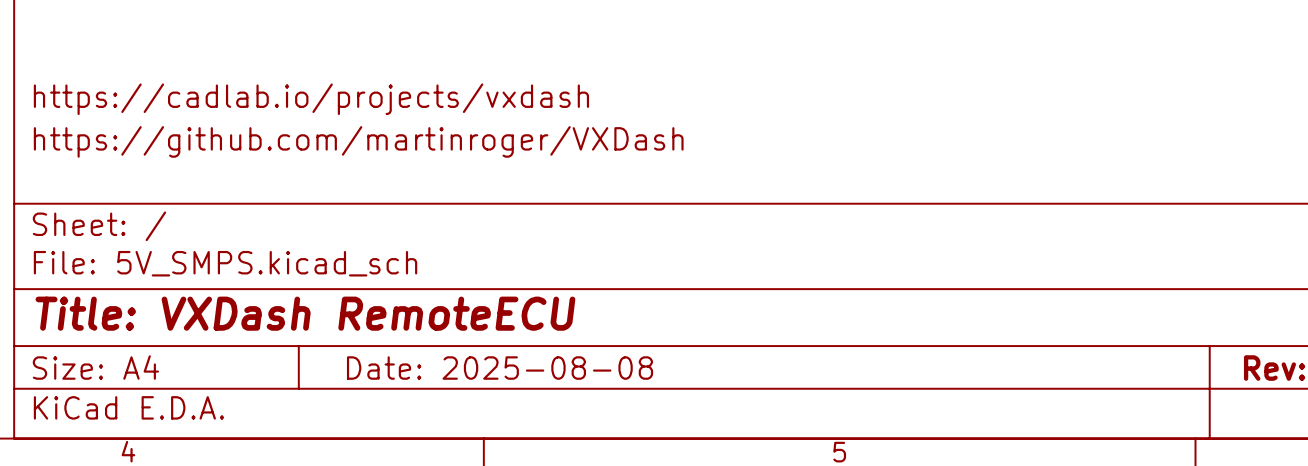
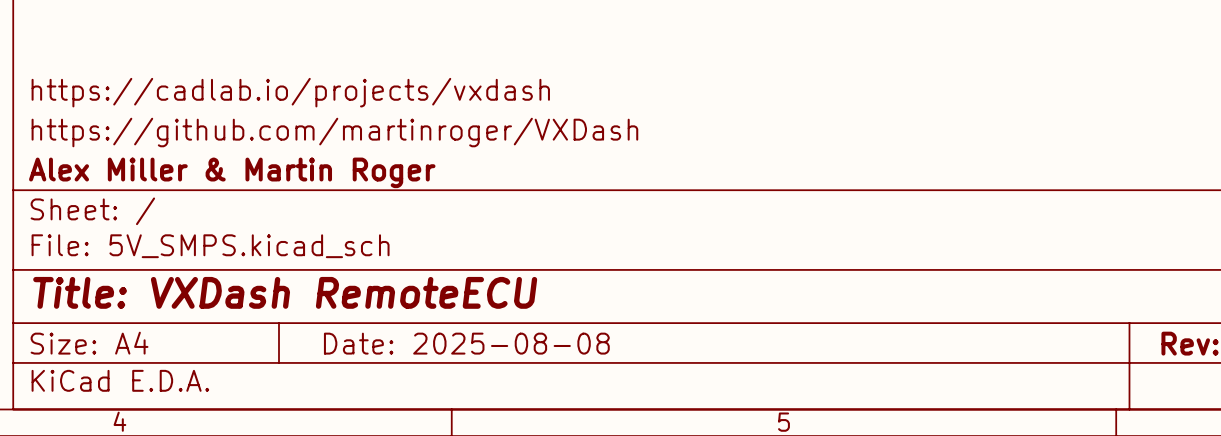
title block: none -> Alex Miller & Martin Roger (232, 172)

